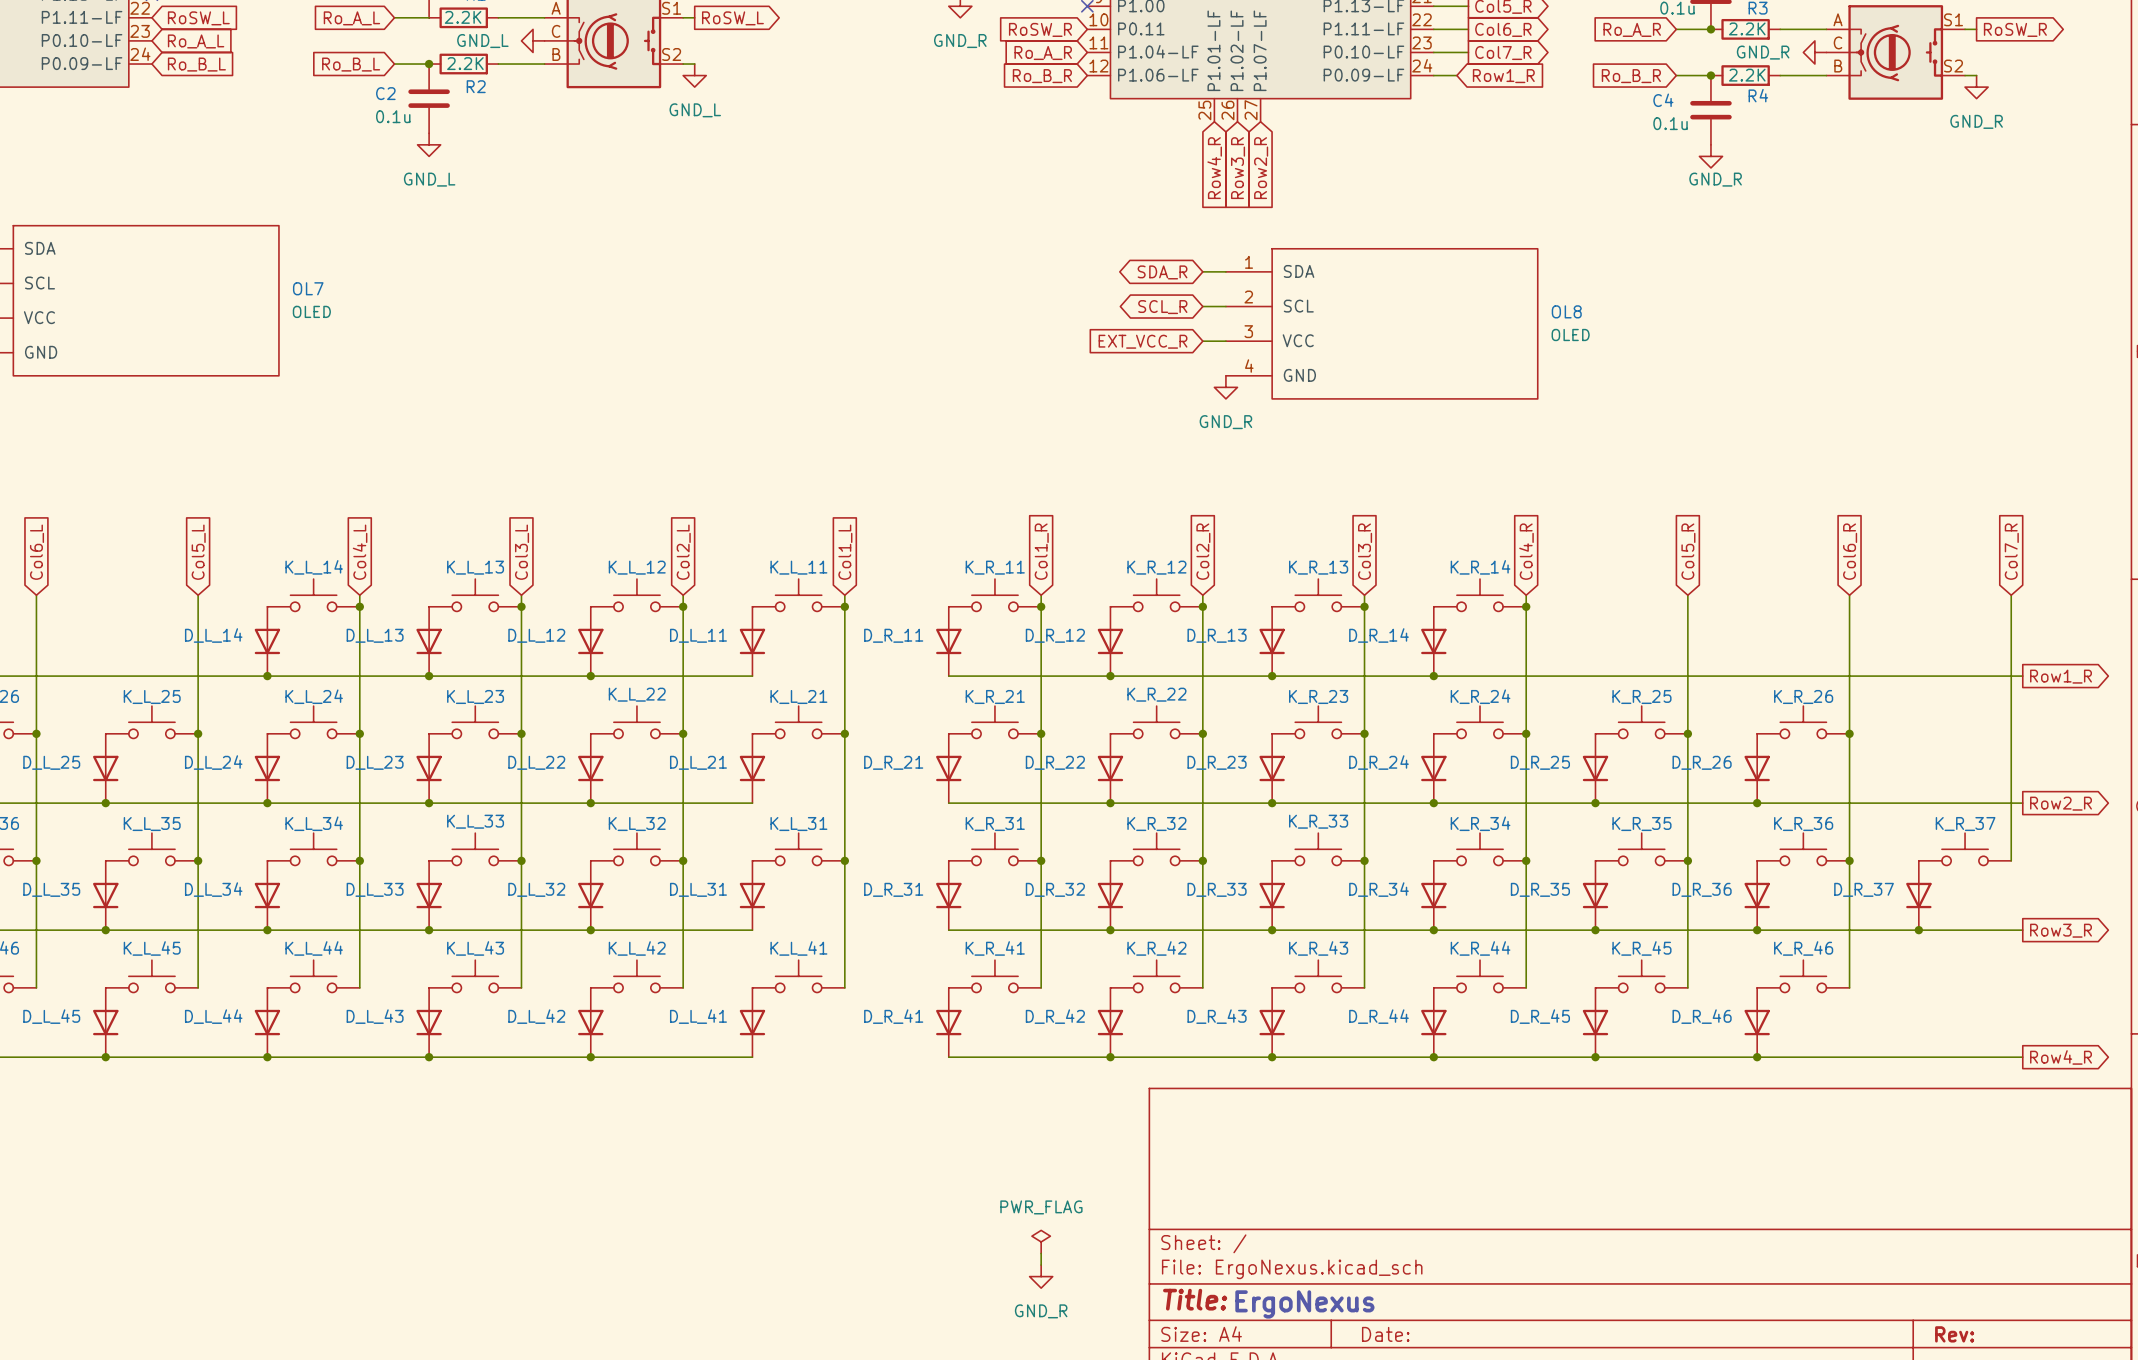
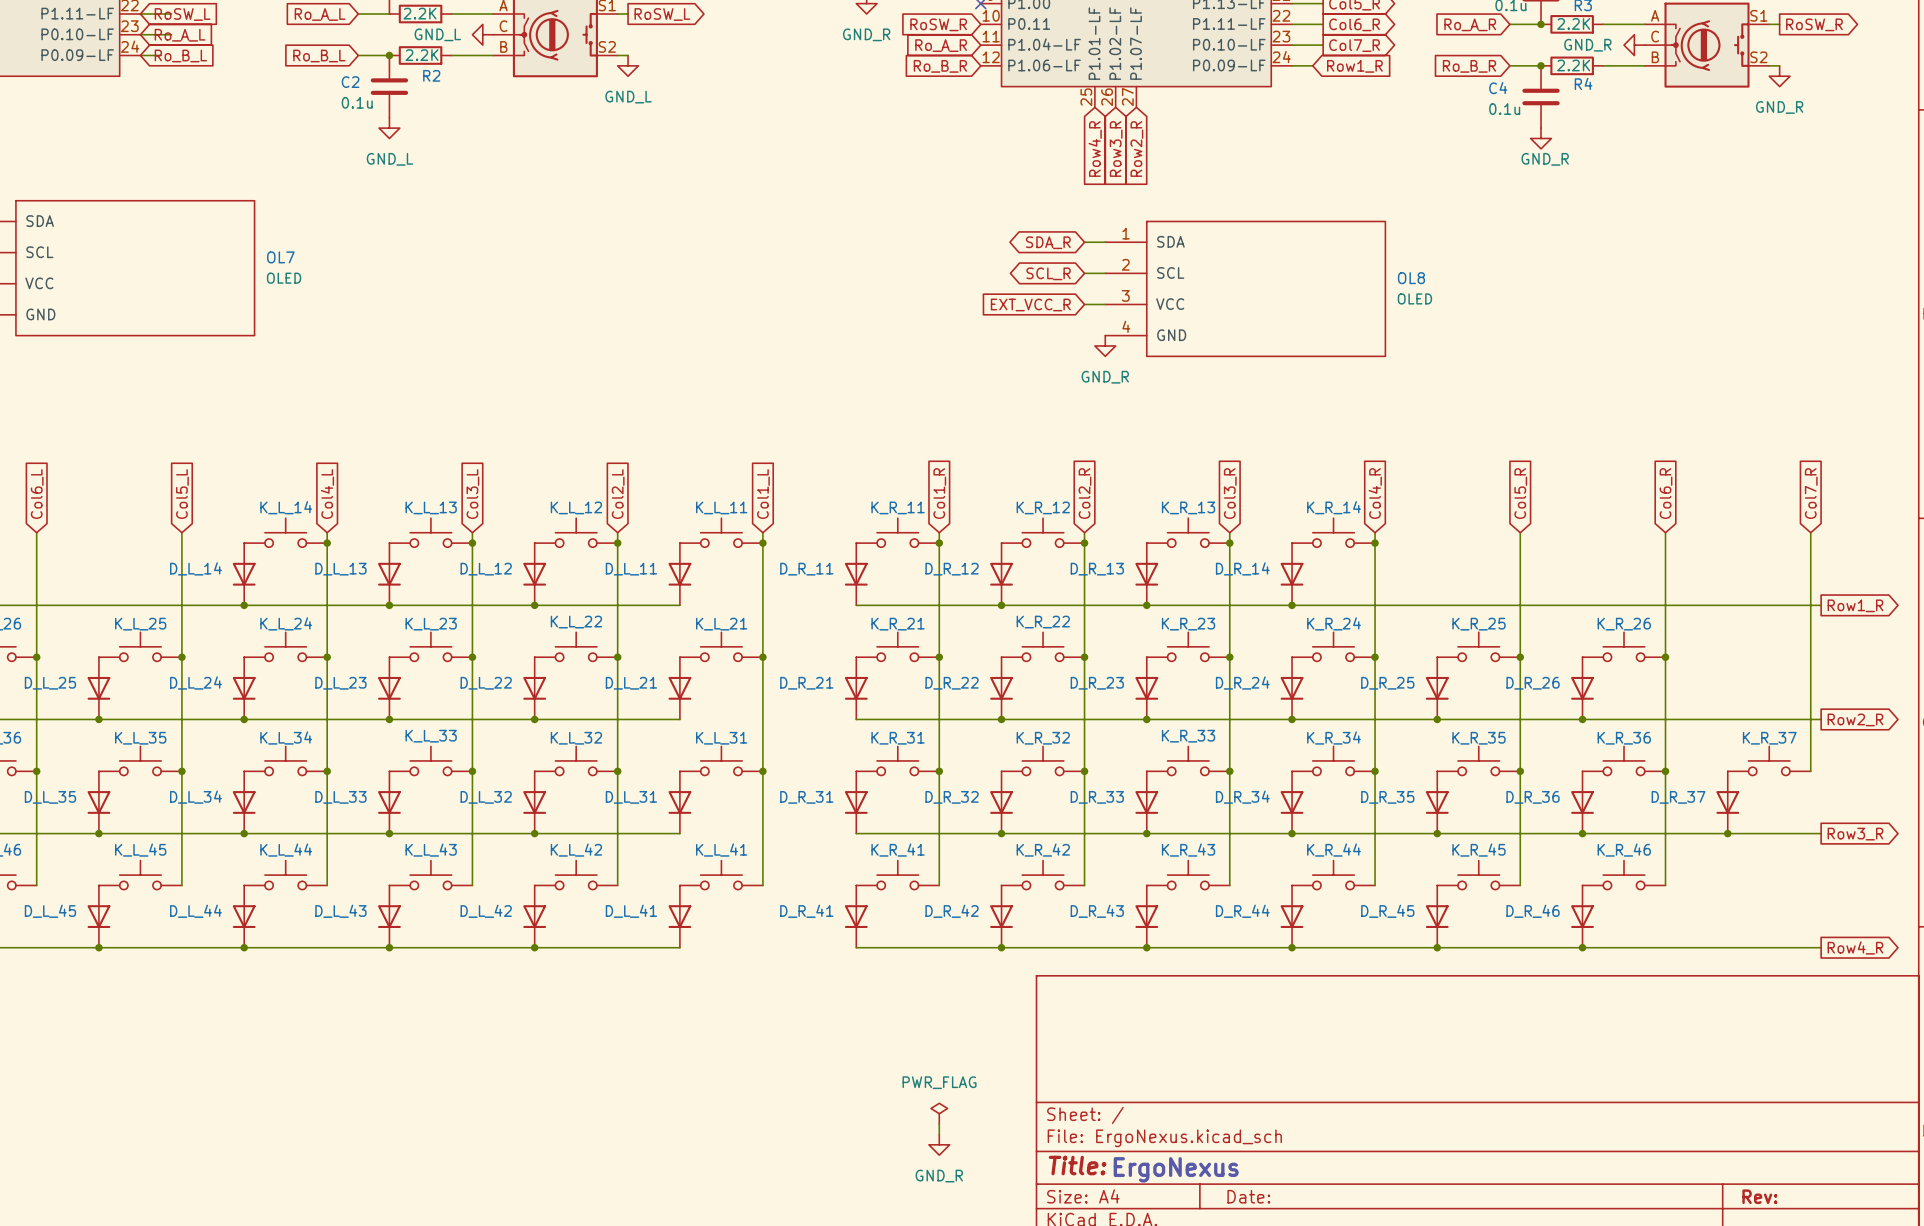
wire: none -> (140, 13) (171, 13)
wire: none -> (140, 34) (171, 34)
wire: none -> (140, 55) (161, 55)

